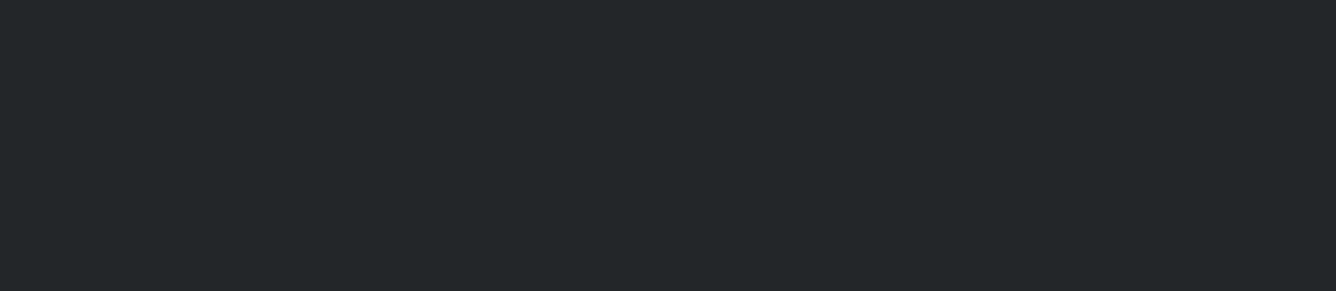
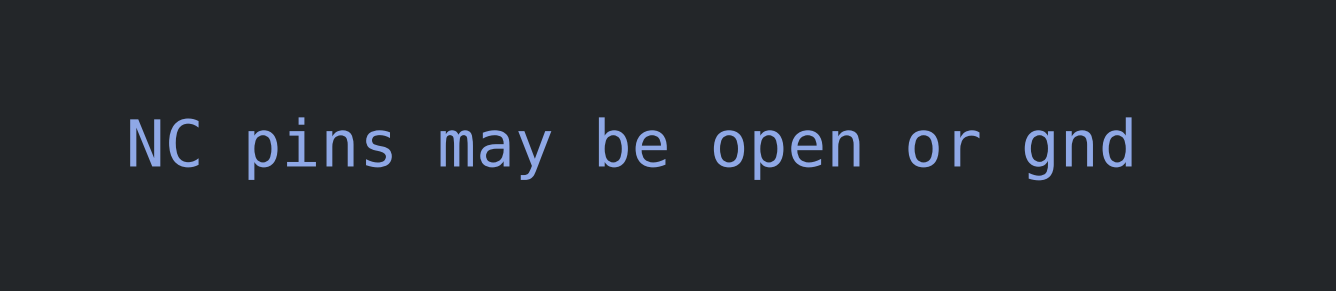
text: none -> NC pins may be open or gnd (630, 148)

